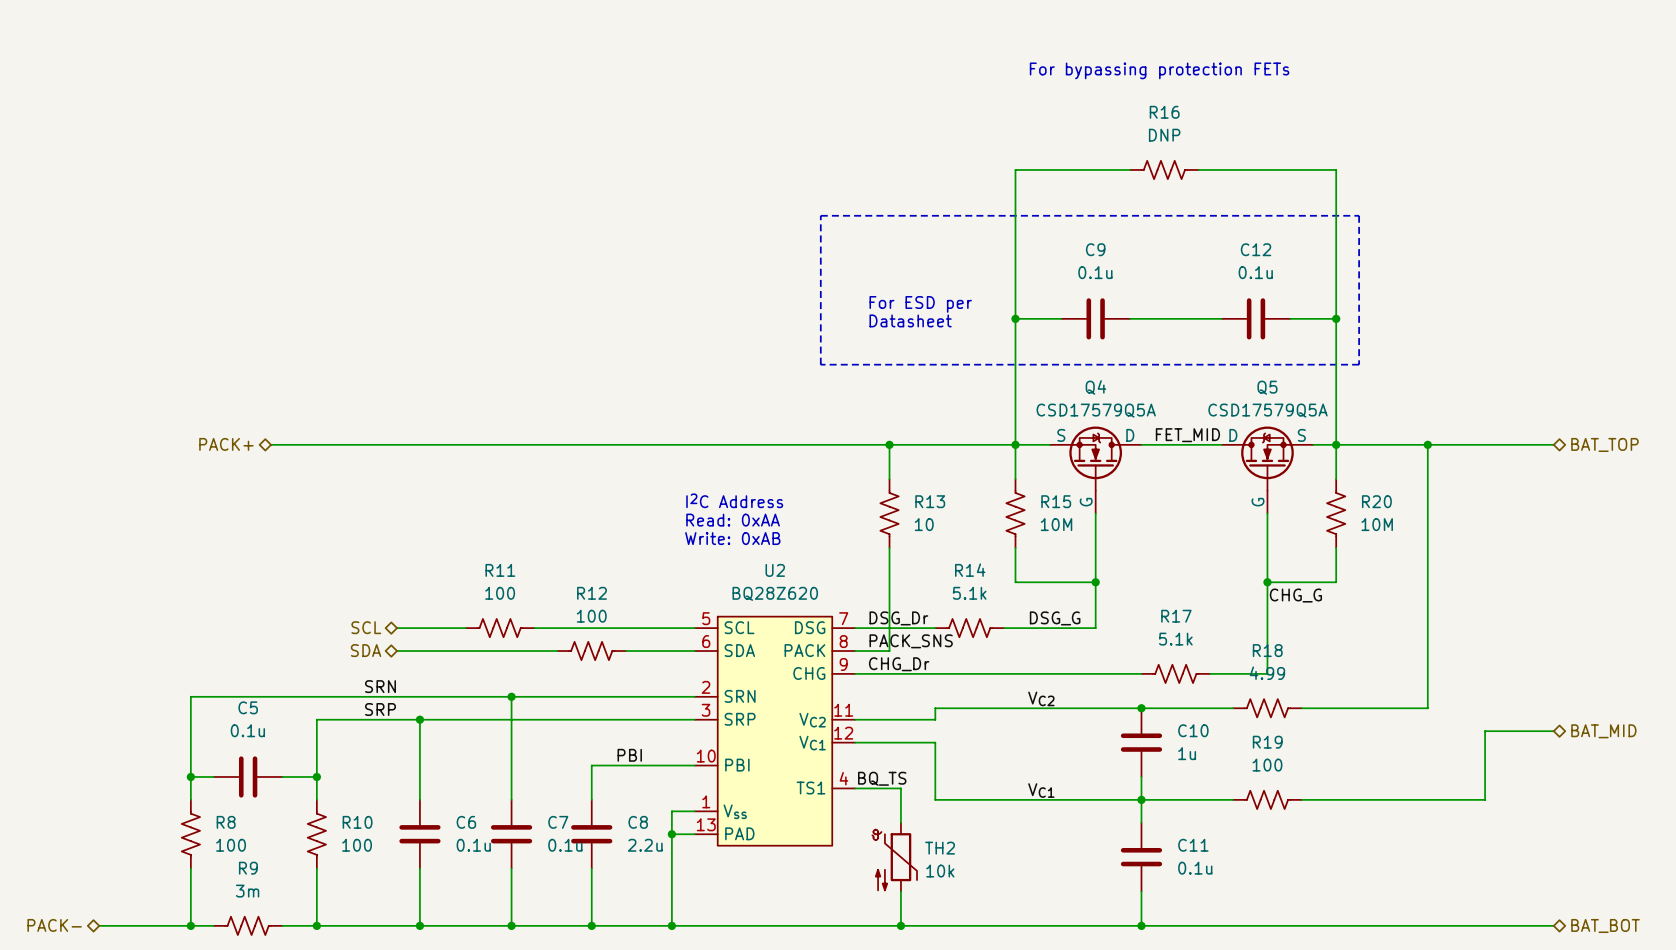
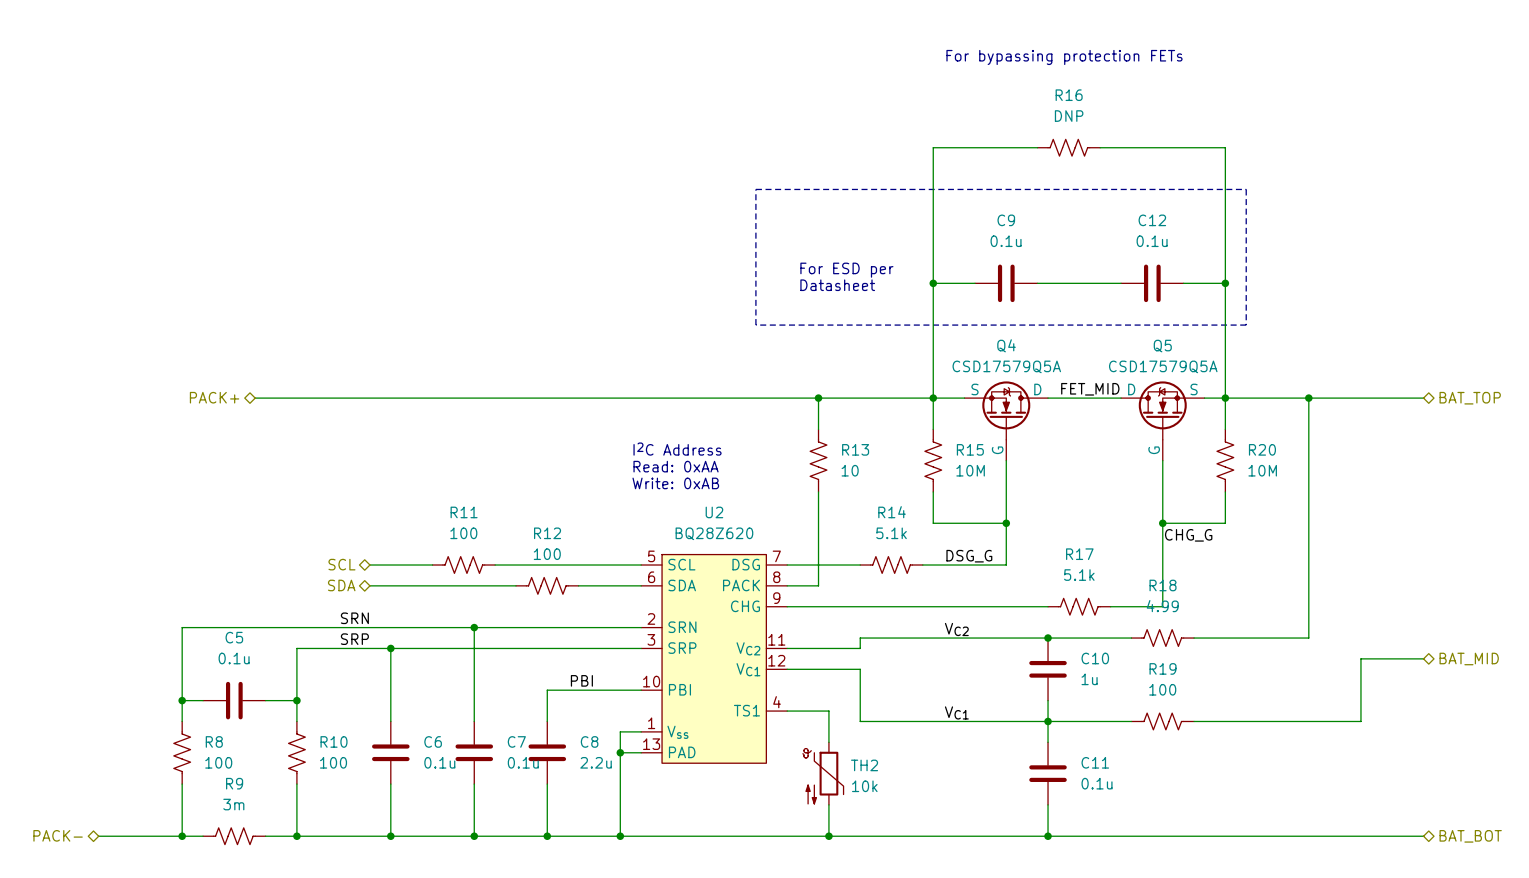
label: DSG_Dr (898, 618) -> none
label: PACK_SNS (911, 641) -> none
label: CHG_Dr (899, 664) -> none
label: BQ_TS (882, 778) -> none

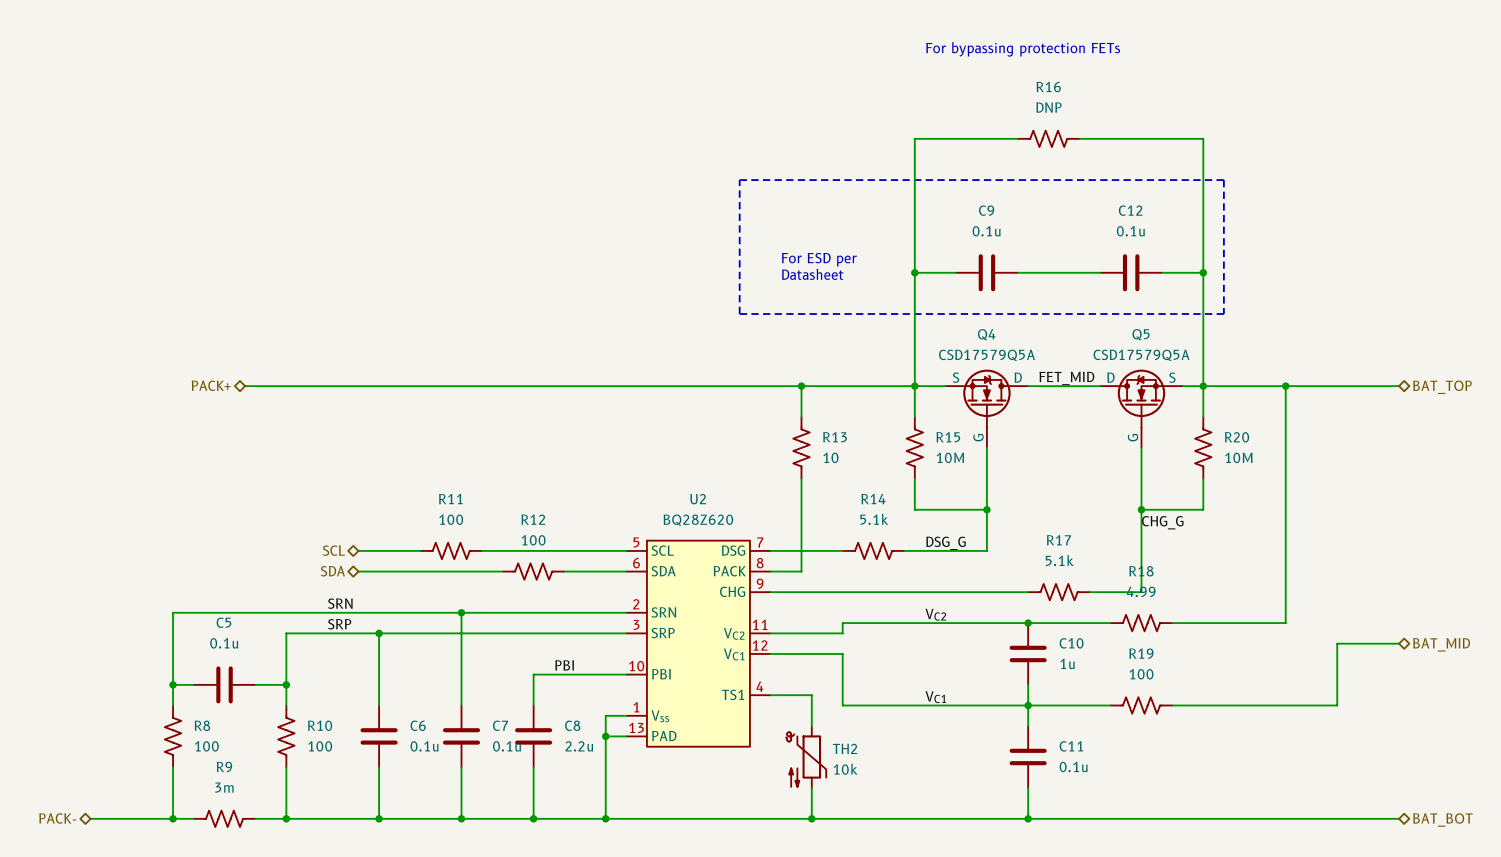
text: I2C Address (677, 449) -> none
text: Read: 0xAA (676, 466) -> none
text: Write: 0xAB (675, 483) -> none

